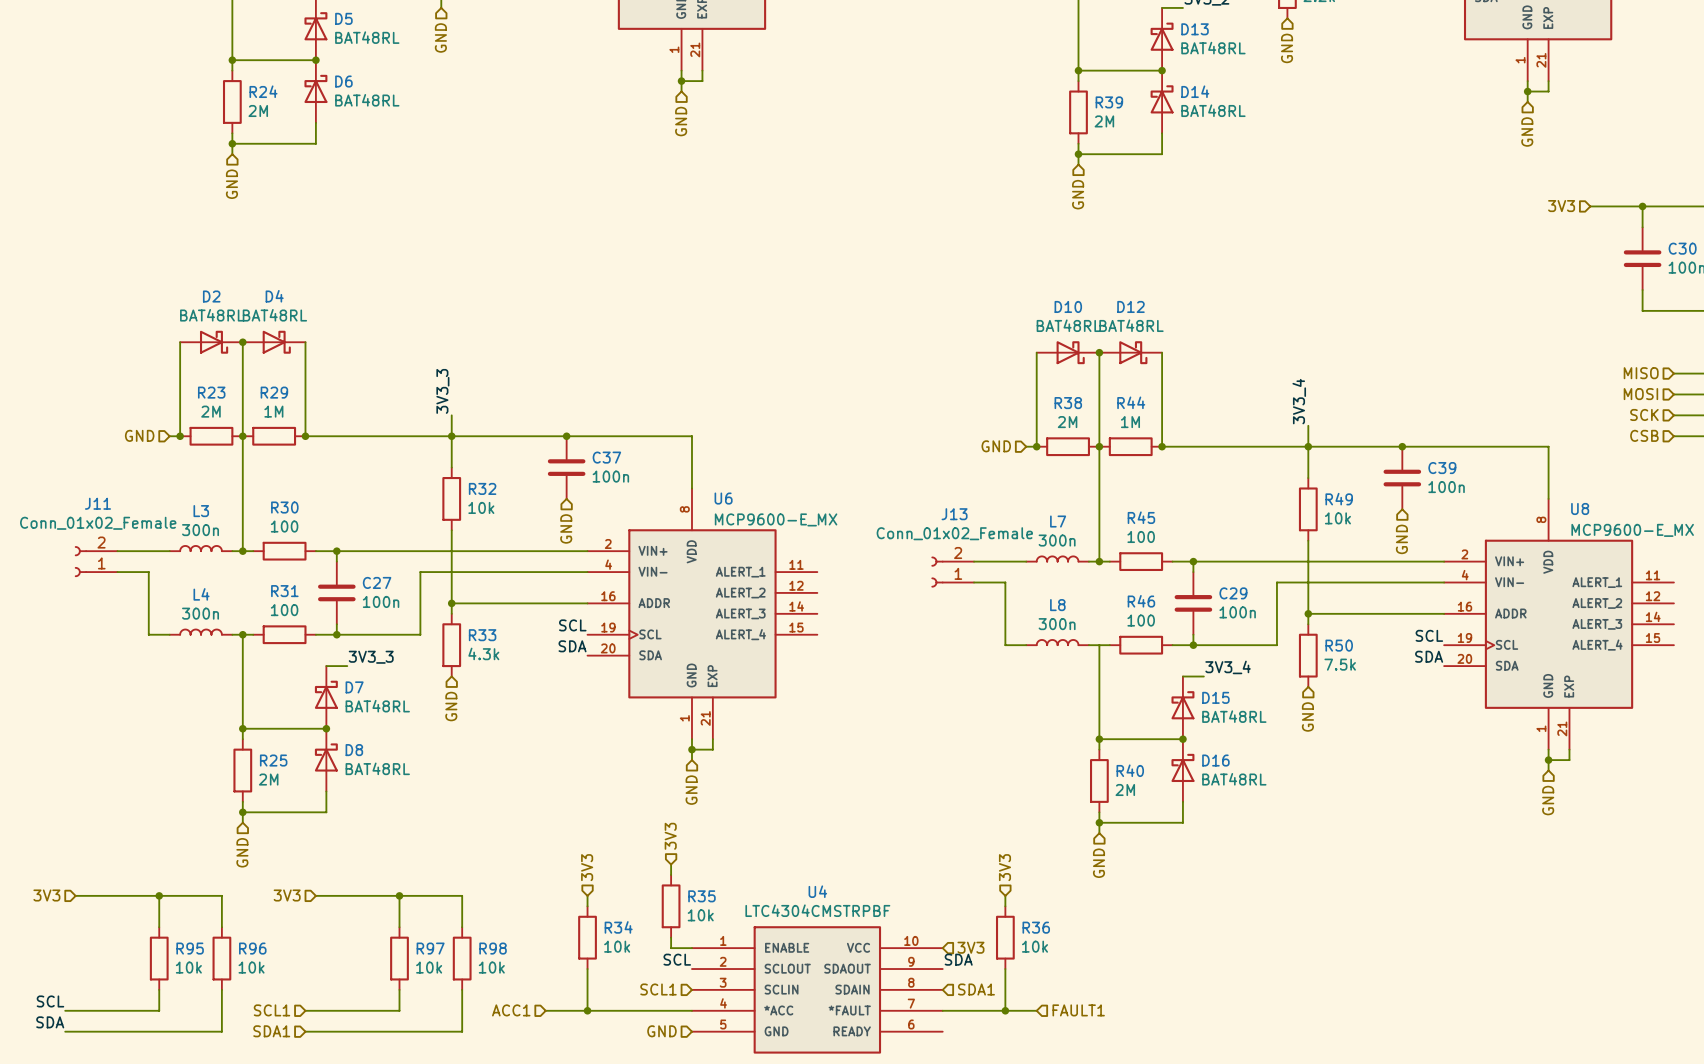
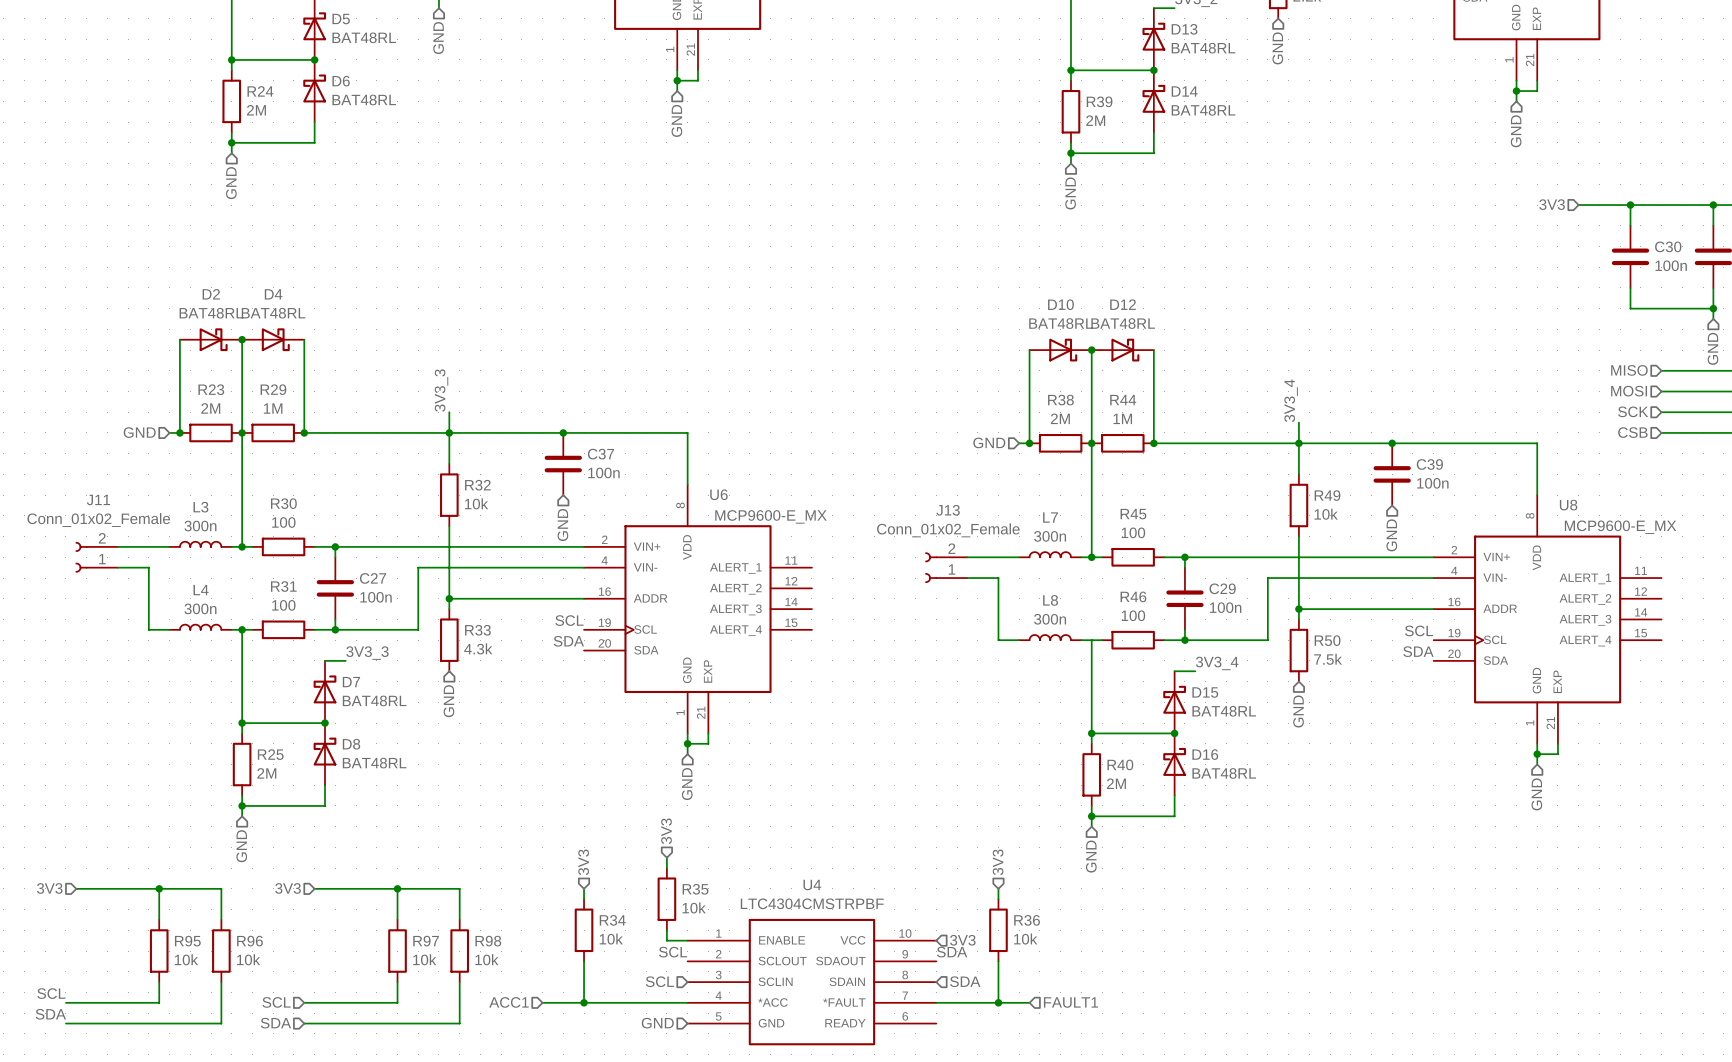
hierarchical label: SCL1 (658, 989) -> SCL (659, 981)
hierarchical label: SDA1 (976, 989) -> SDA (965, 981)
hierarchical label: SCL1 (271, 1010) -> SCL (276, 1002)
hierarchical label: SDA1 (271, 1031) -> SDA (275, 1023)

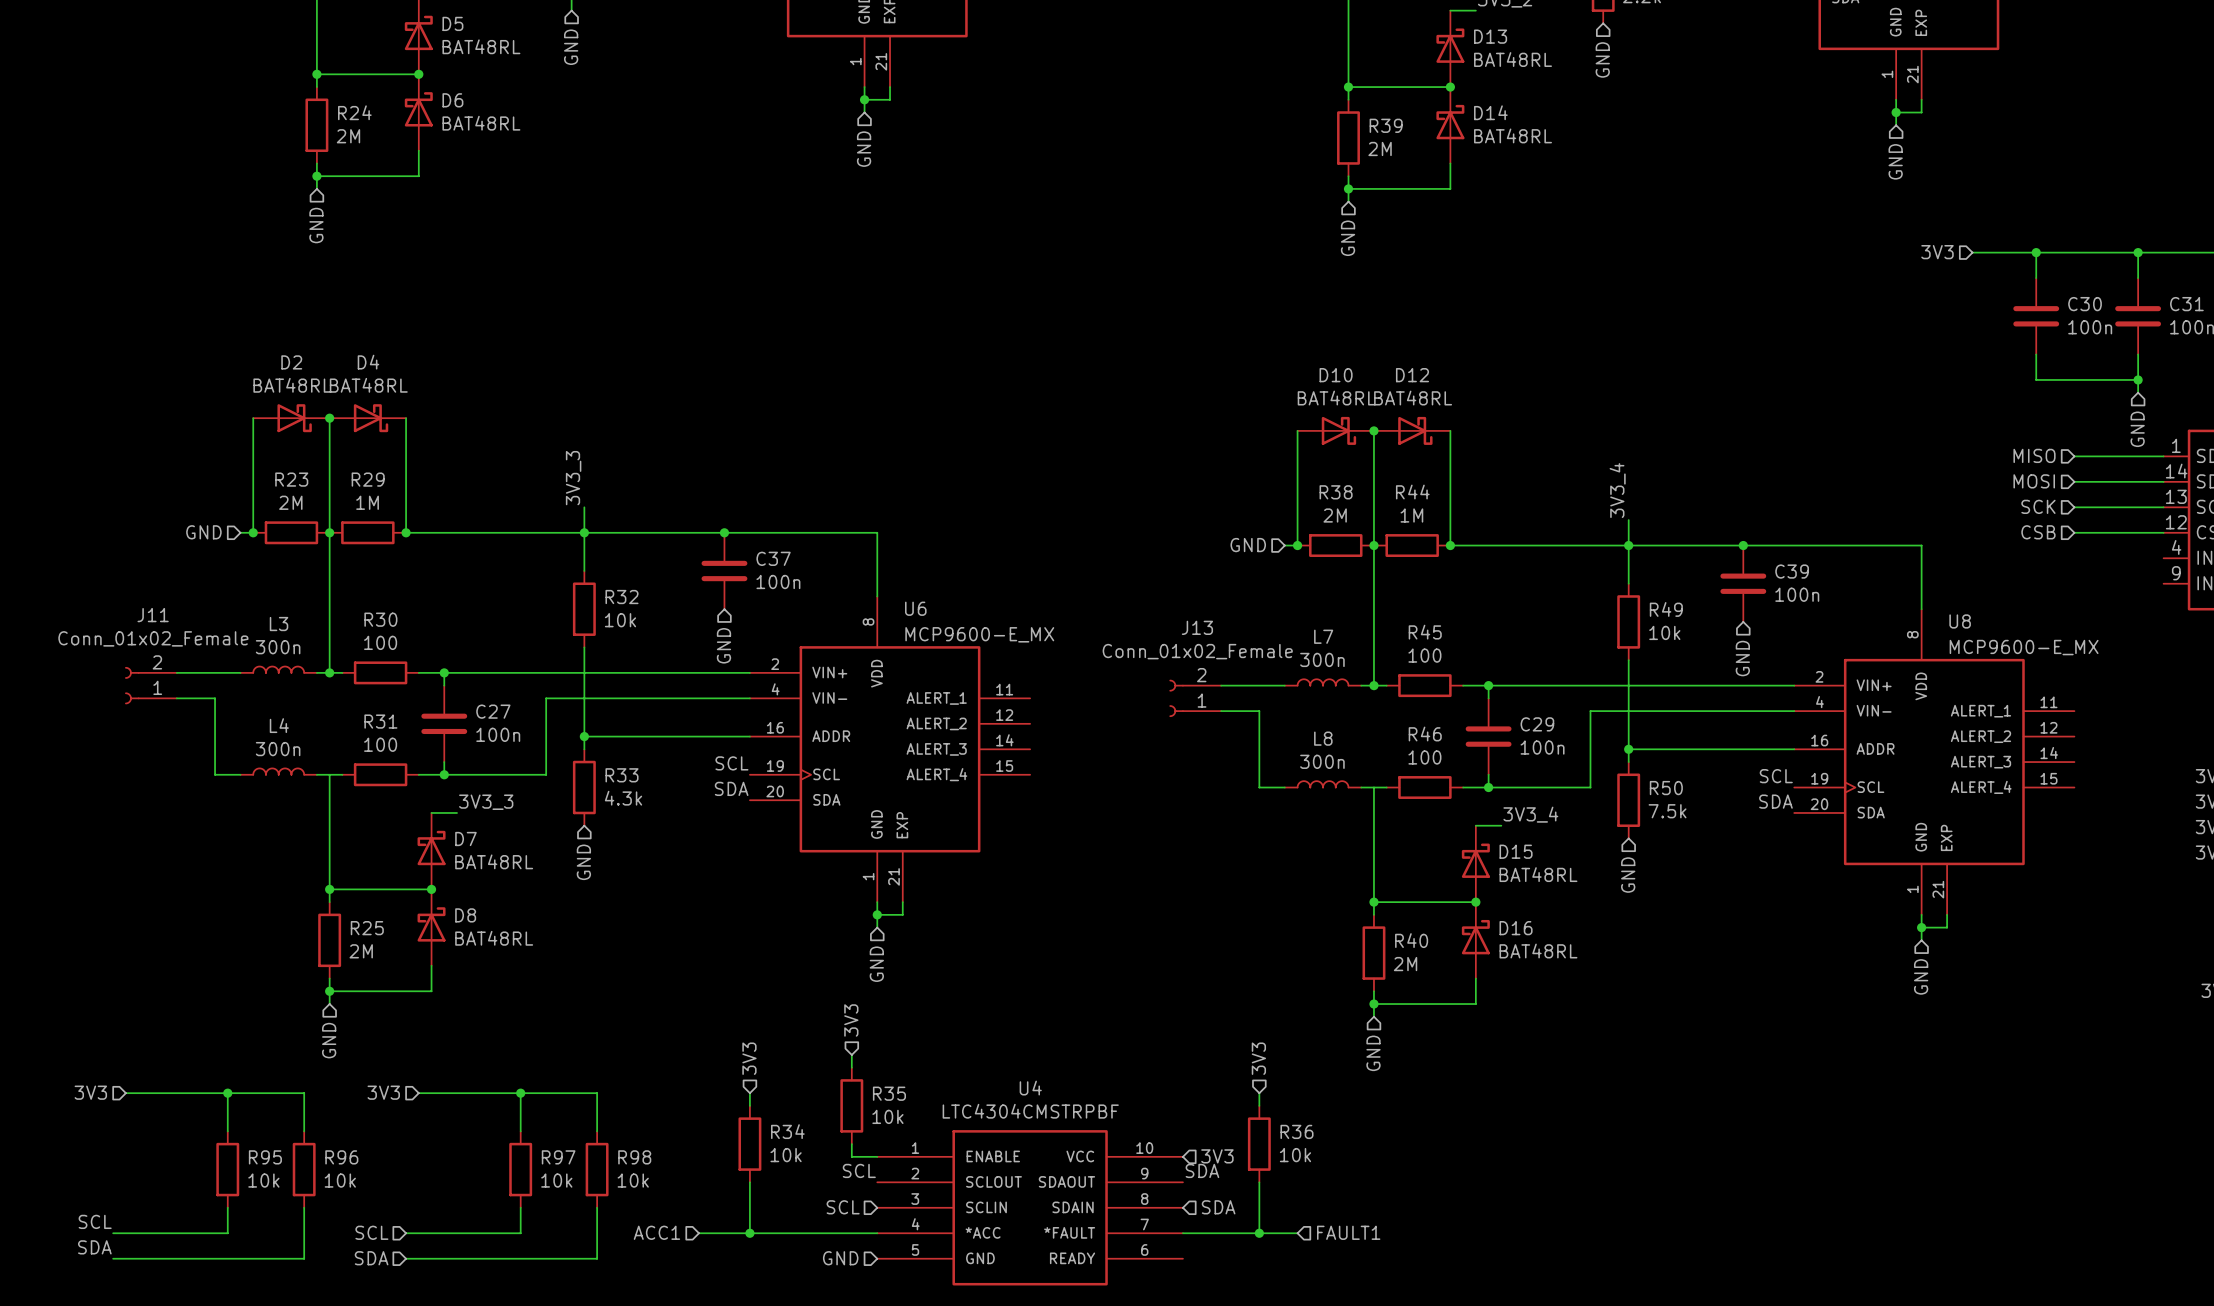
junction: (242, 629) -> none

